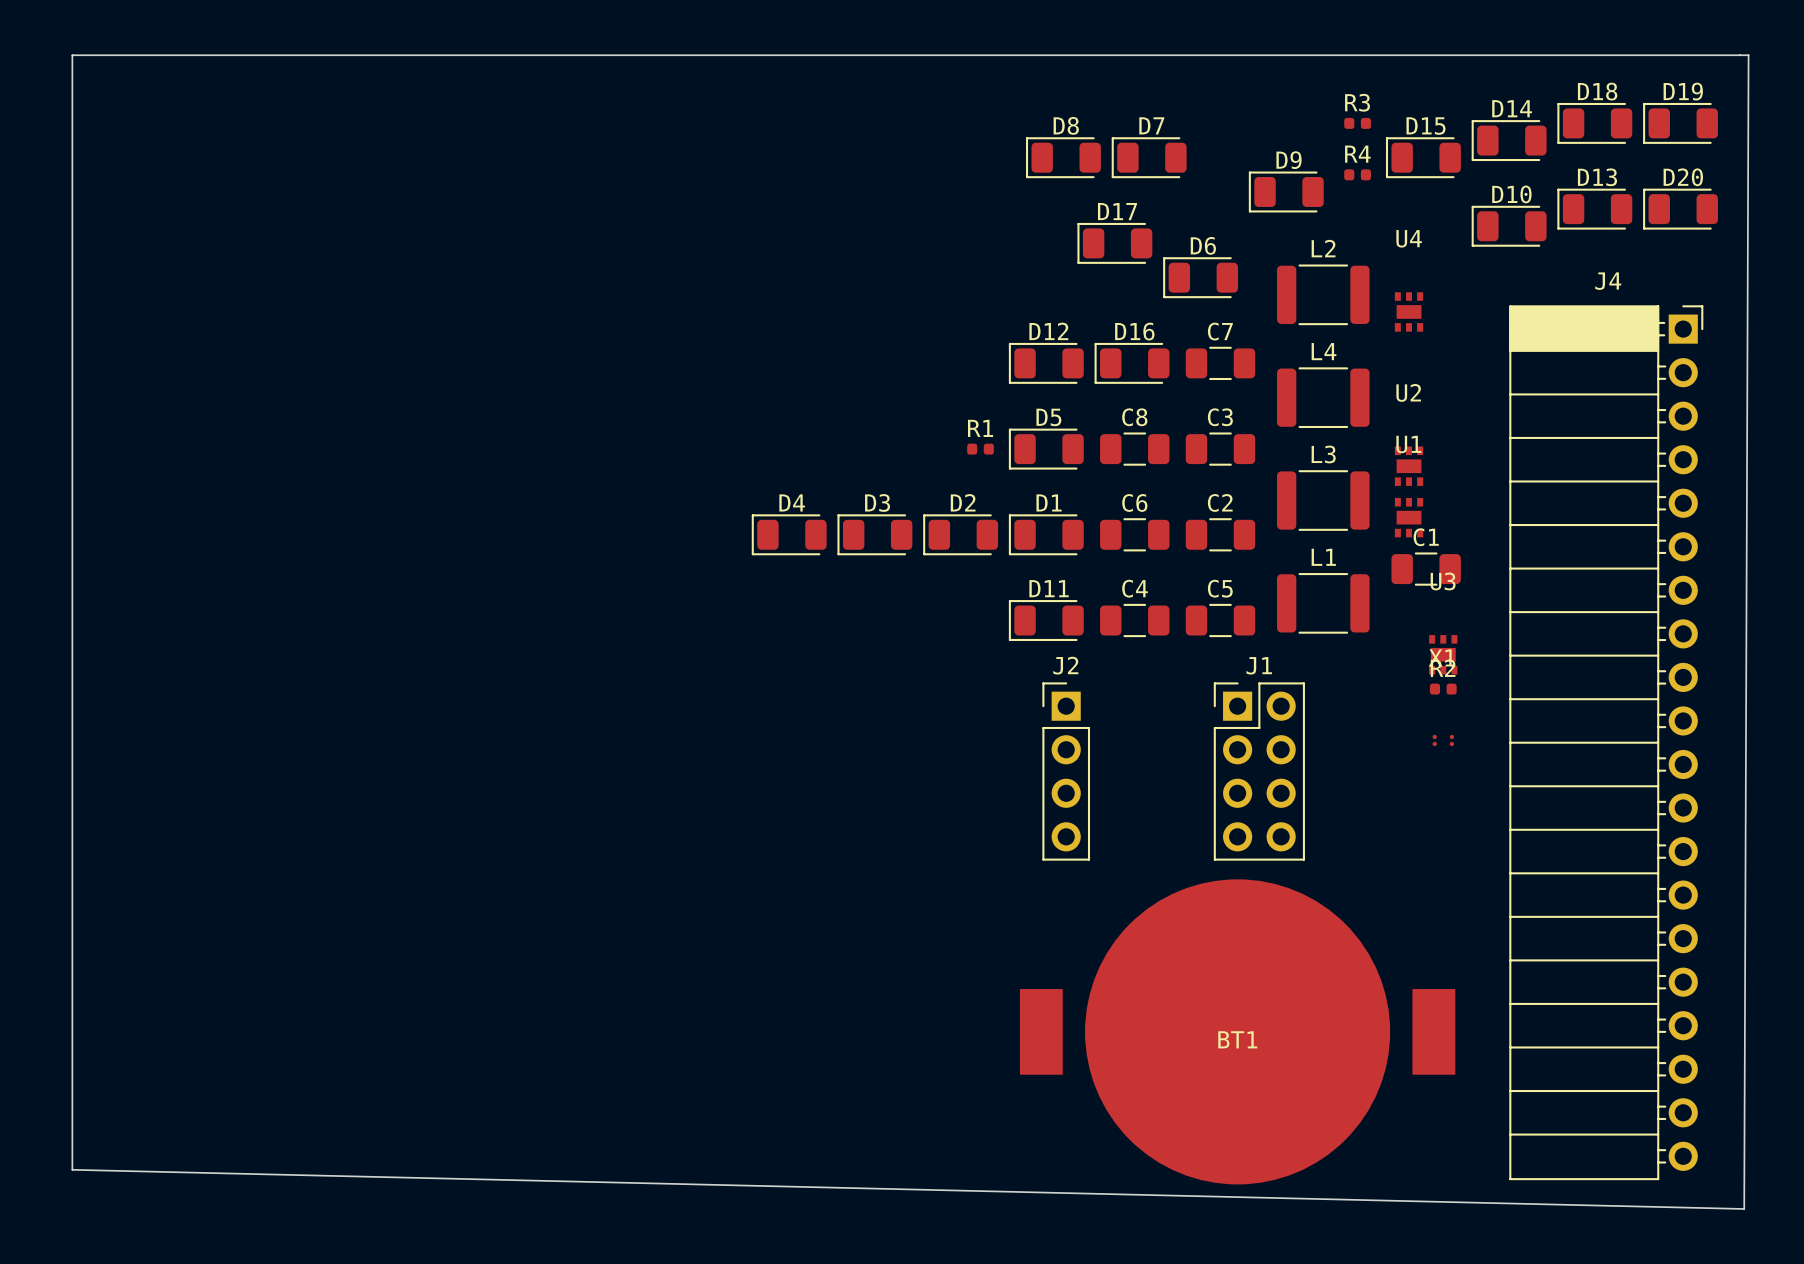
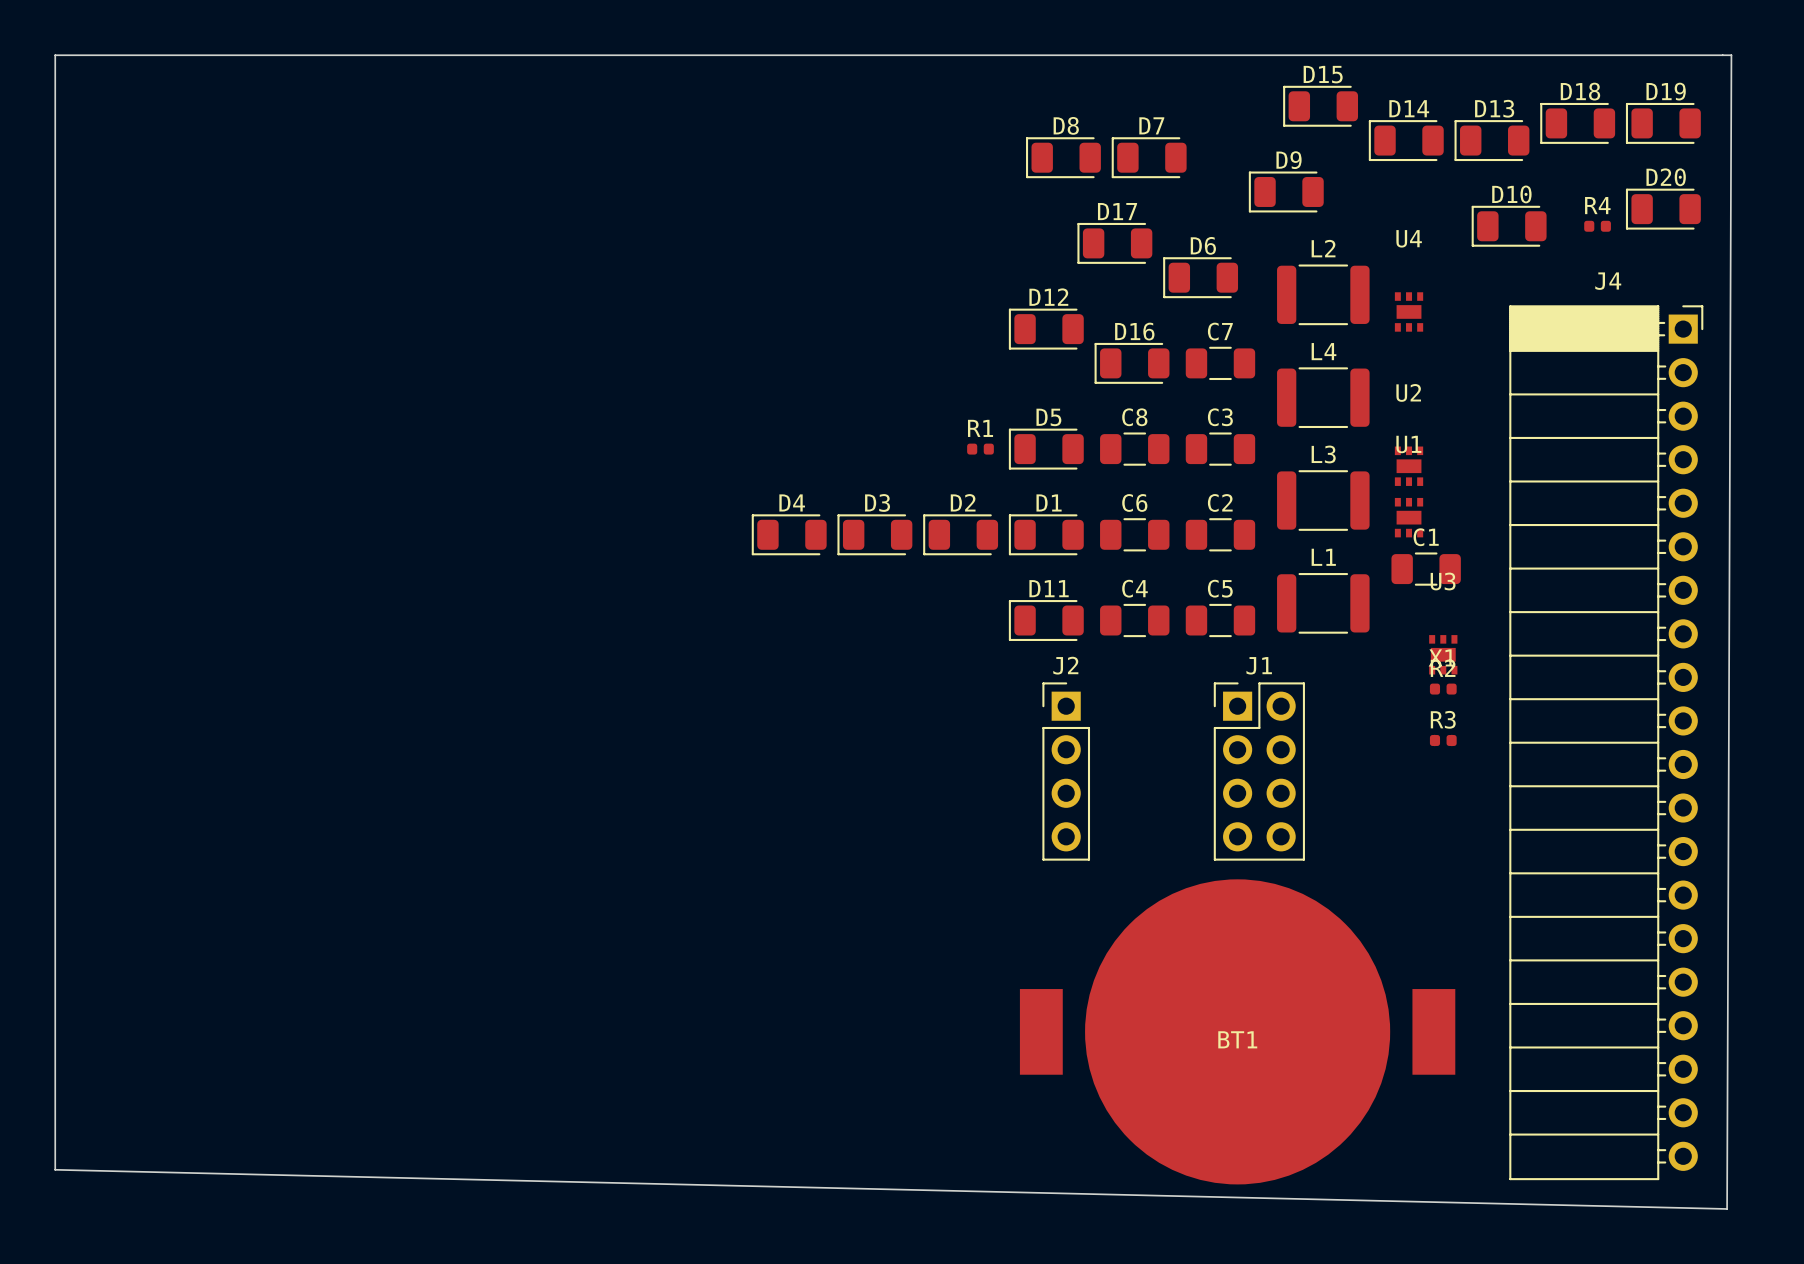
board edge: (72, 55) (72, 1169) (1744, 1208) (1748, 55) (1731, 55) -> (72, 55) (55, 55) (55, 1169) (1727, 1208) (1731, 55)
R3 position: (1357, 123) -> (1443, 740)
D18 position: (1594, 123) -> (1577, 123)
D19 position: (1680, 123) -> (1663, 123)
D14 position: (1509, 140) -> (1406, 140)
D15 position: (1423, 157) -> (1320, 106)
R4 position: (1357, 174) -> (1597, 226)
D13 position: (1594, 209) -> (1491, 140)
D20 position: (1680, 209) -> (1663, 209)
D12 position: (1046, 363) -> (1046, 329)

